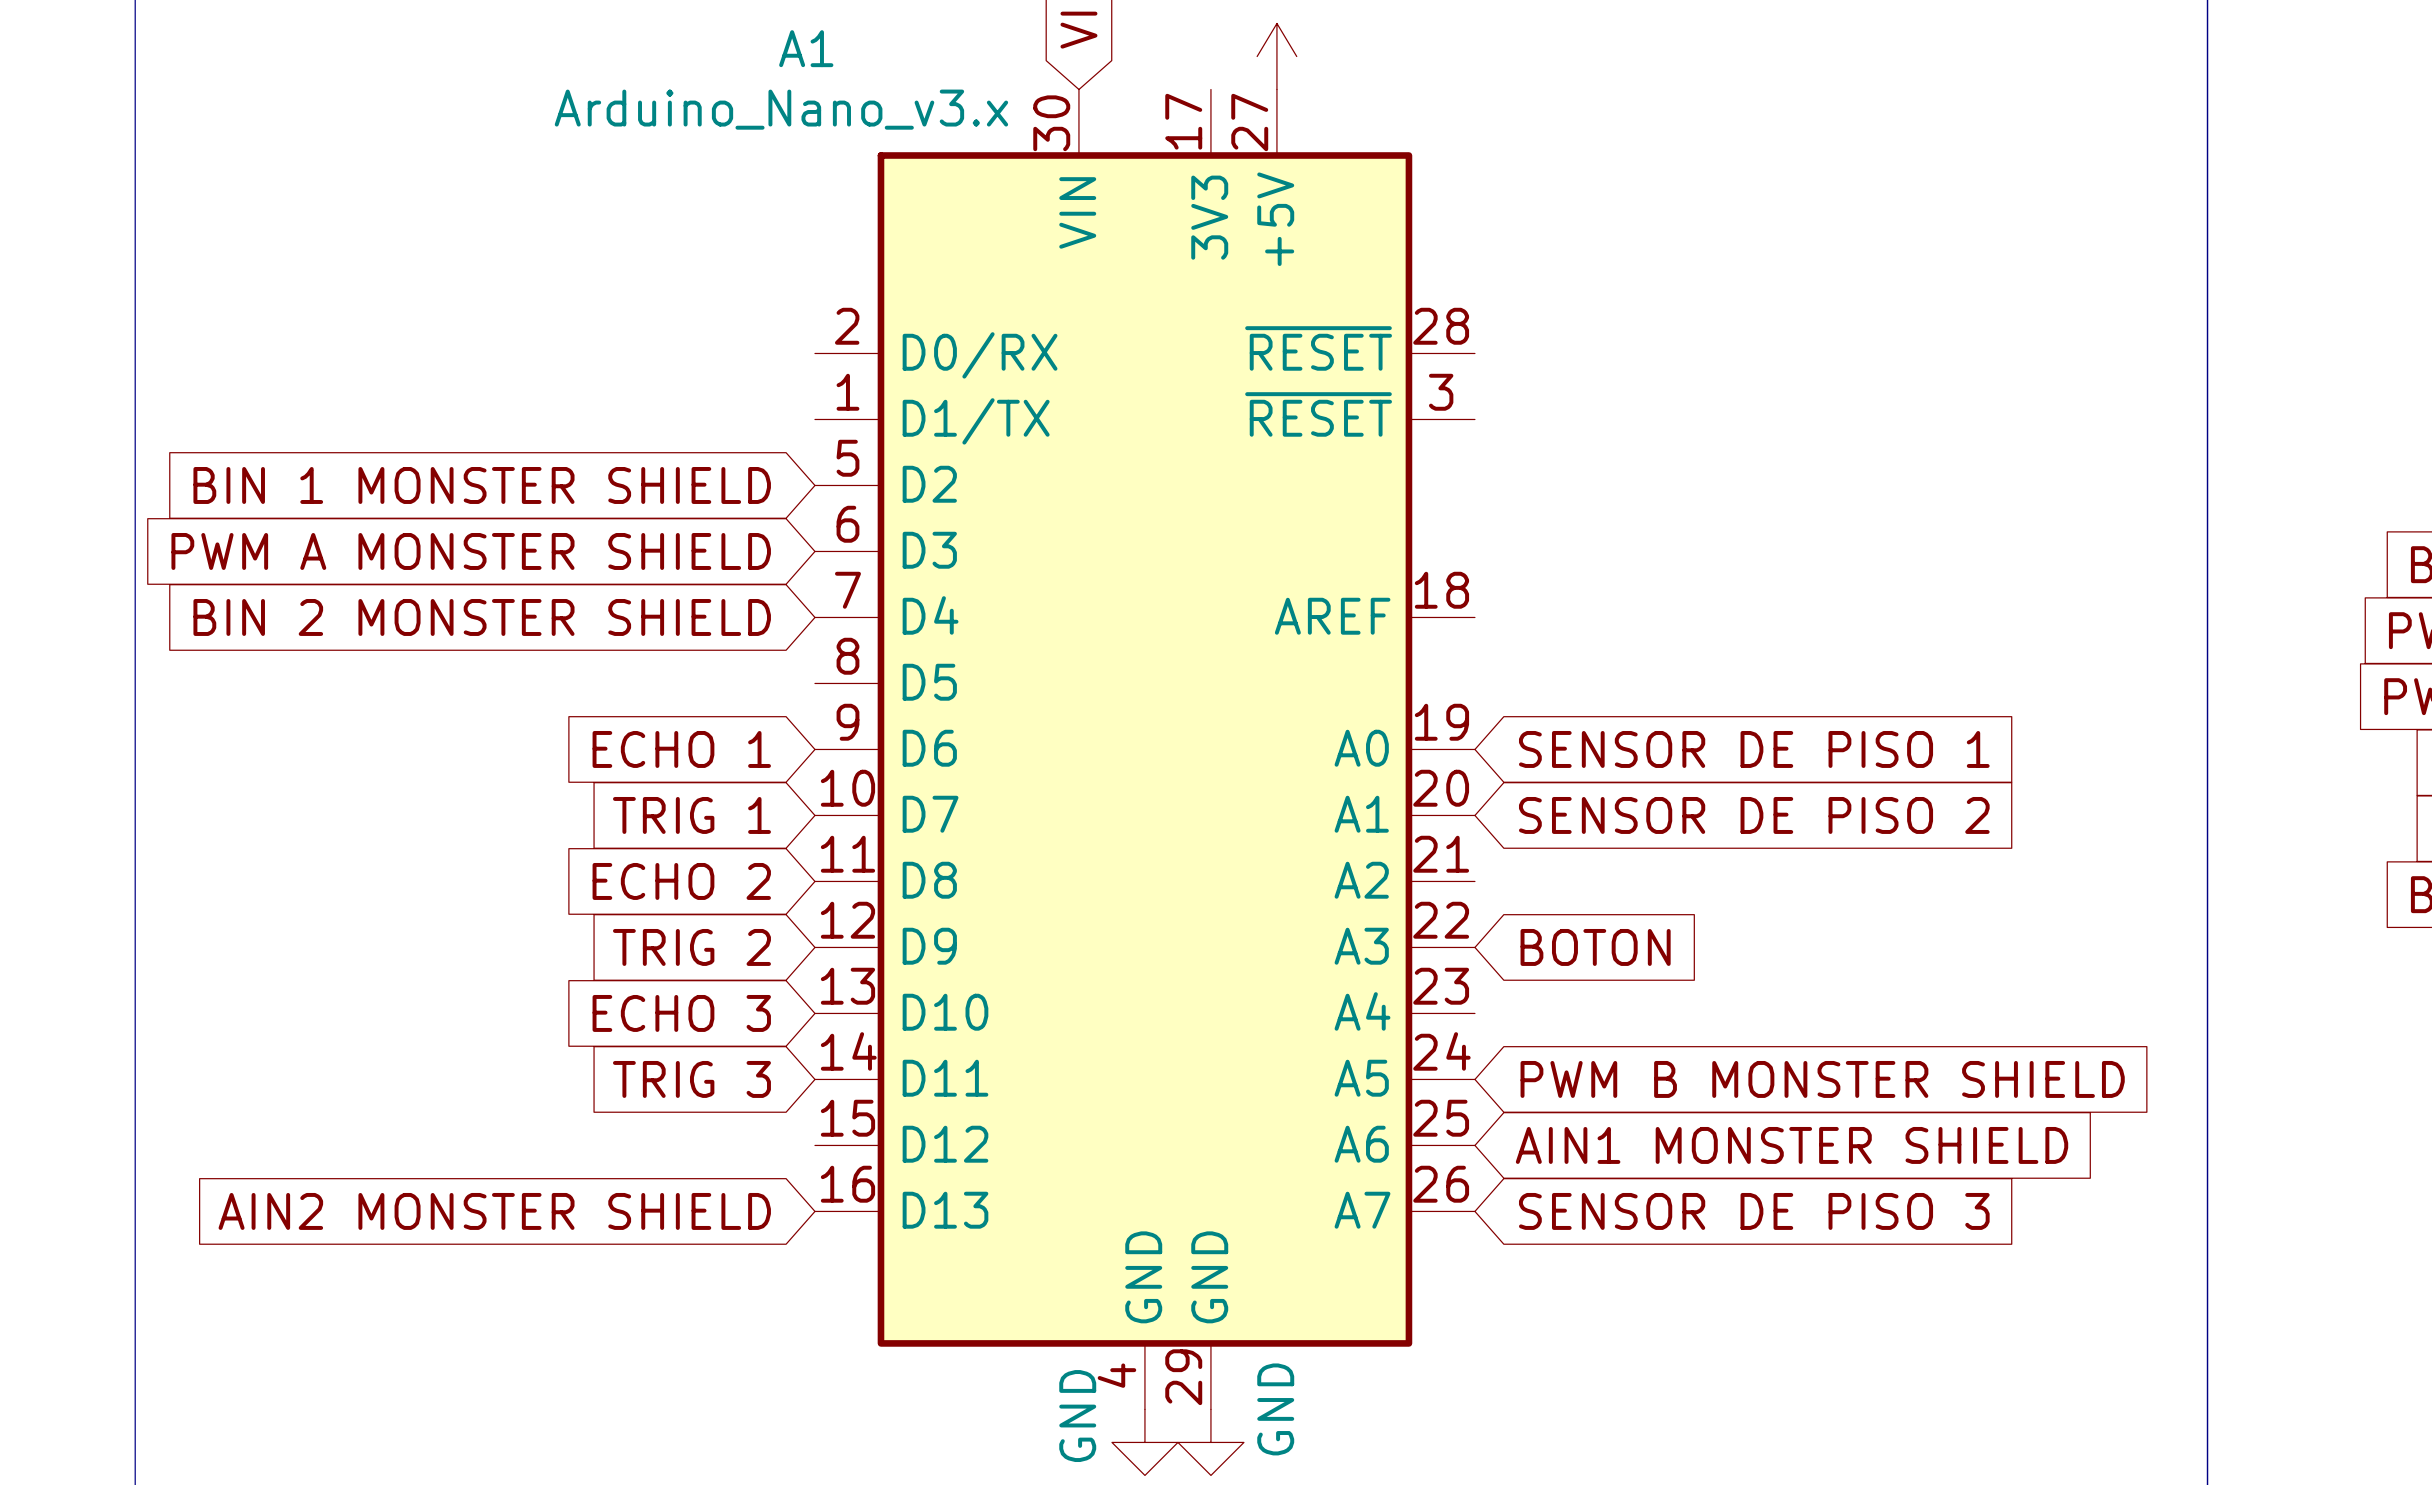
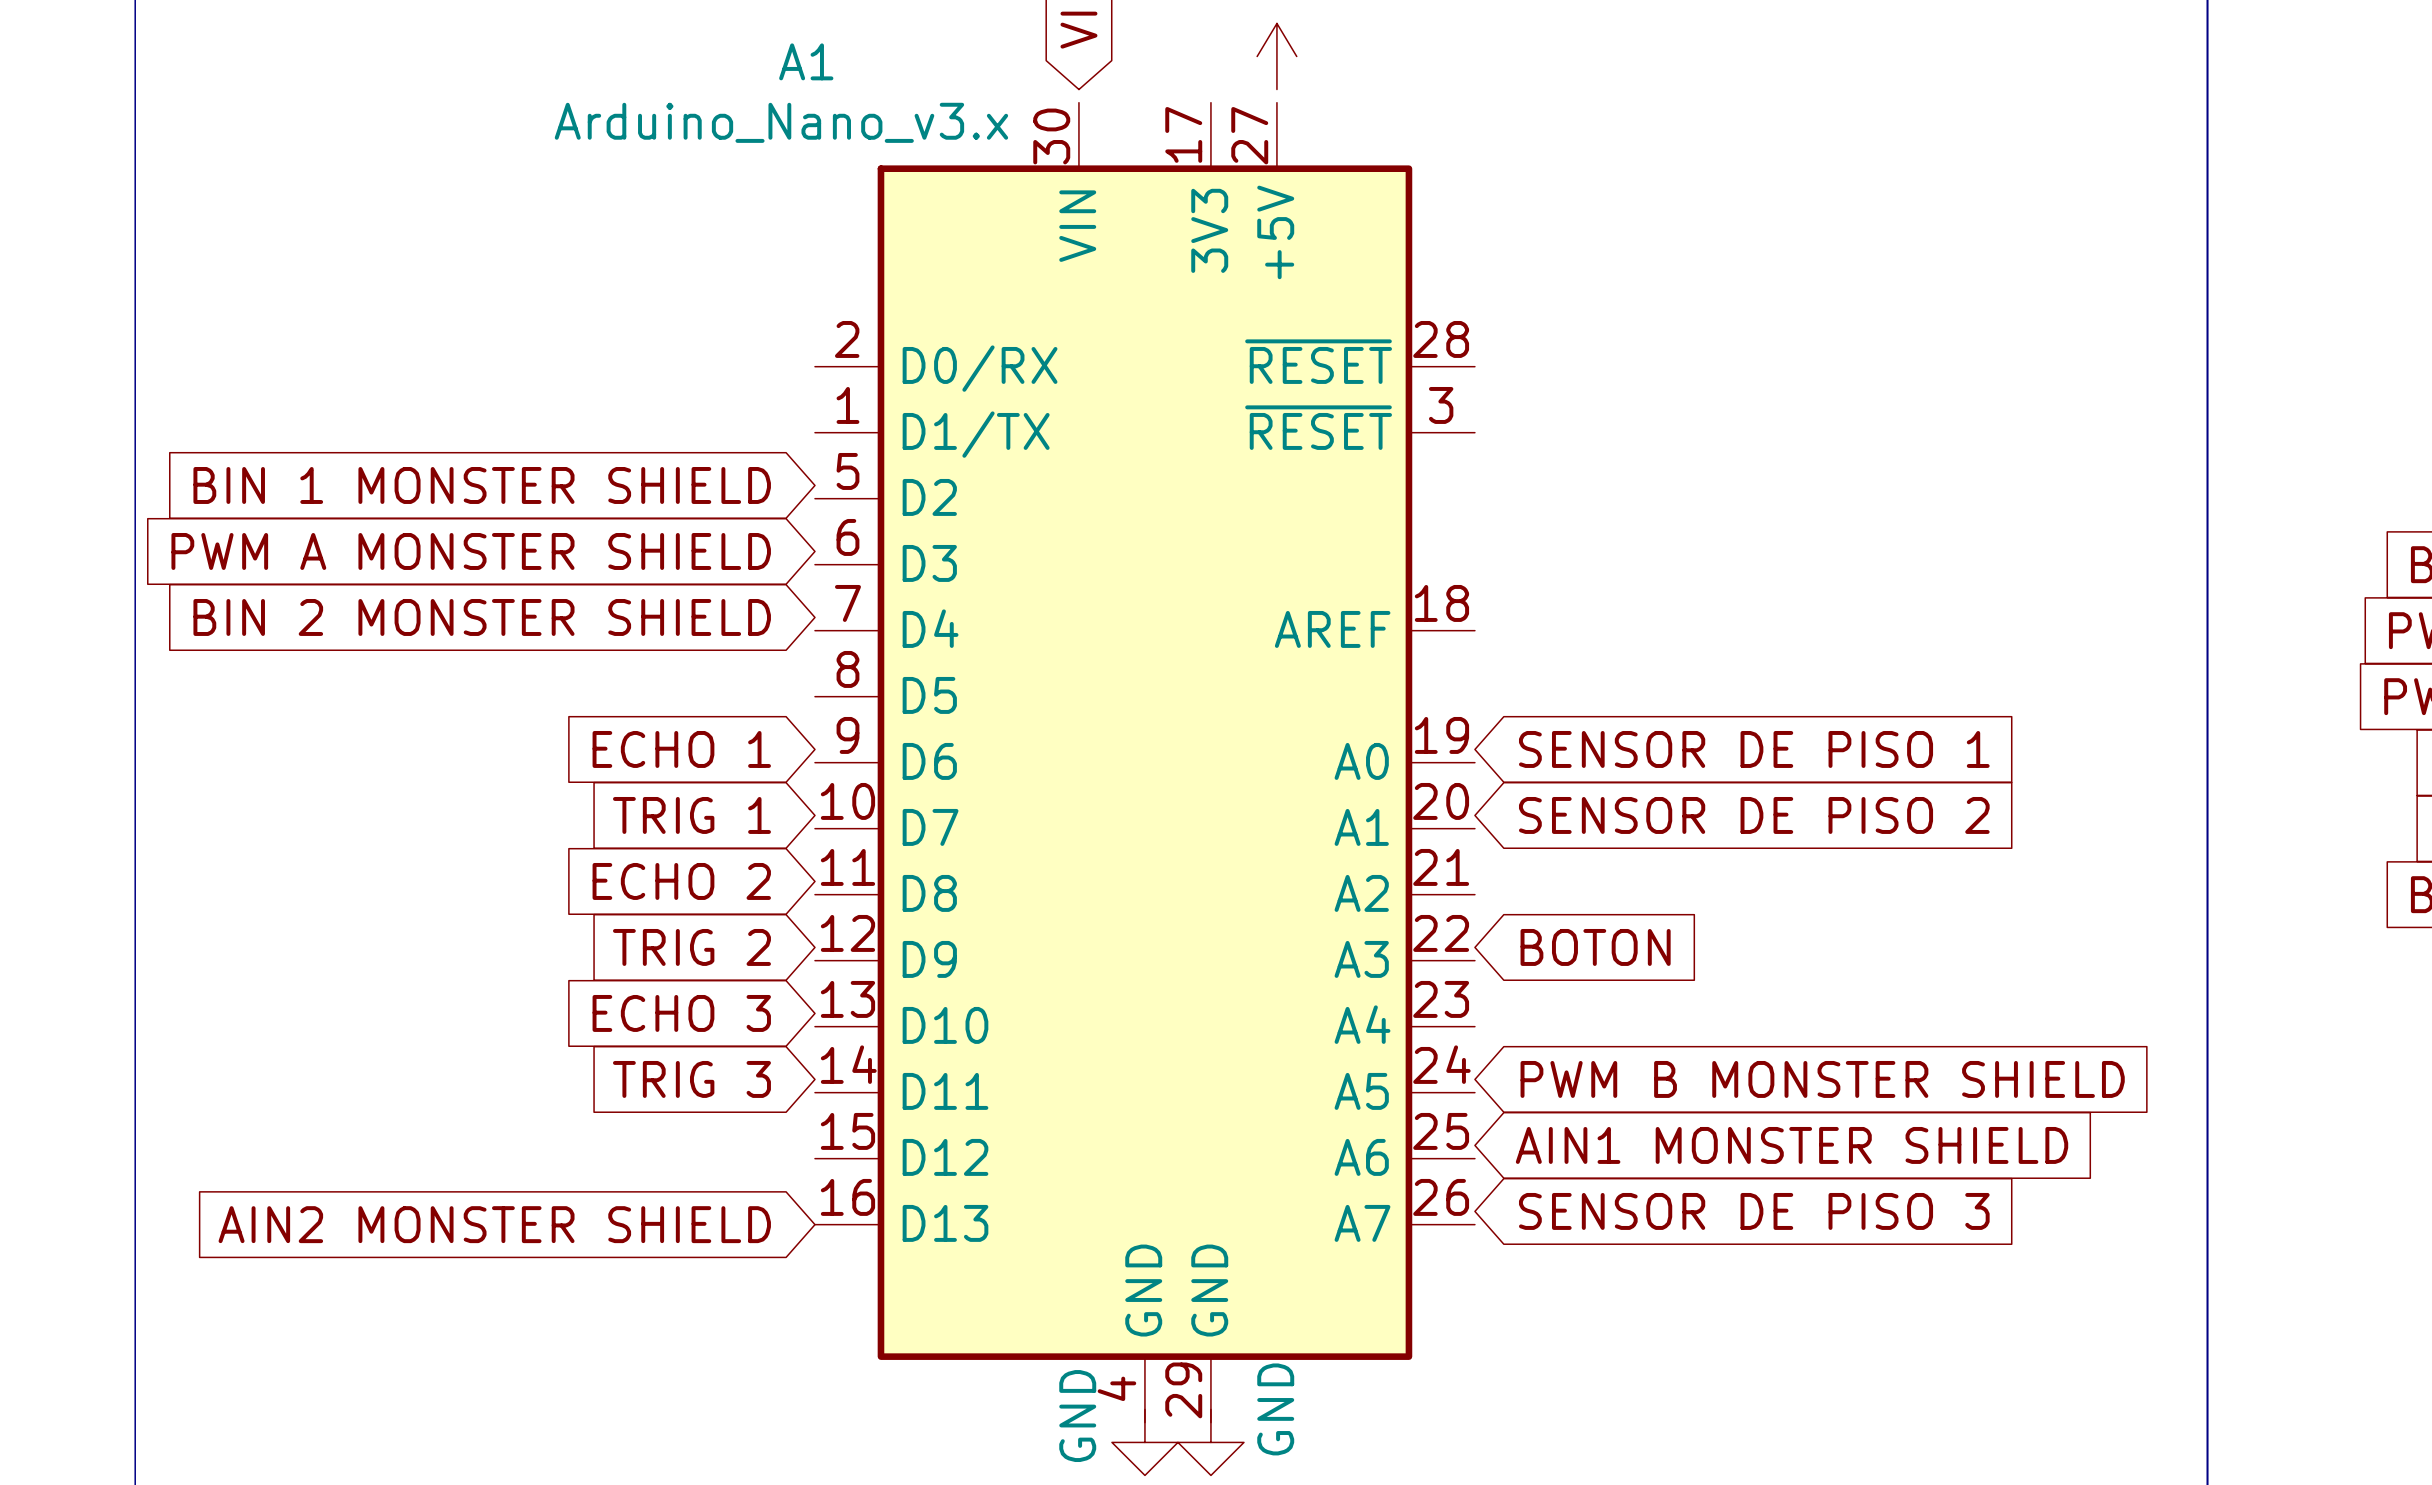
A1 position: (1144, 749) -> (1144, 762)
global label position: AIN2 MONSTER SHIELD (494, 1211) -> AIN2 MONSTER SHIELD (494, 1224)

